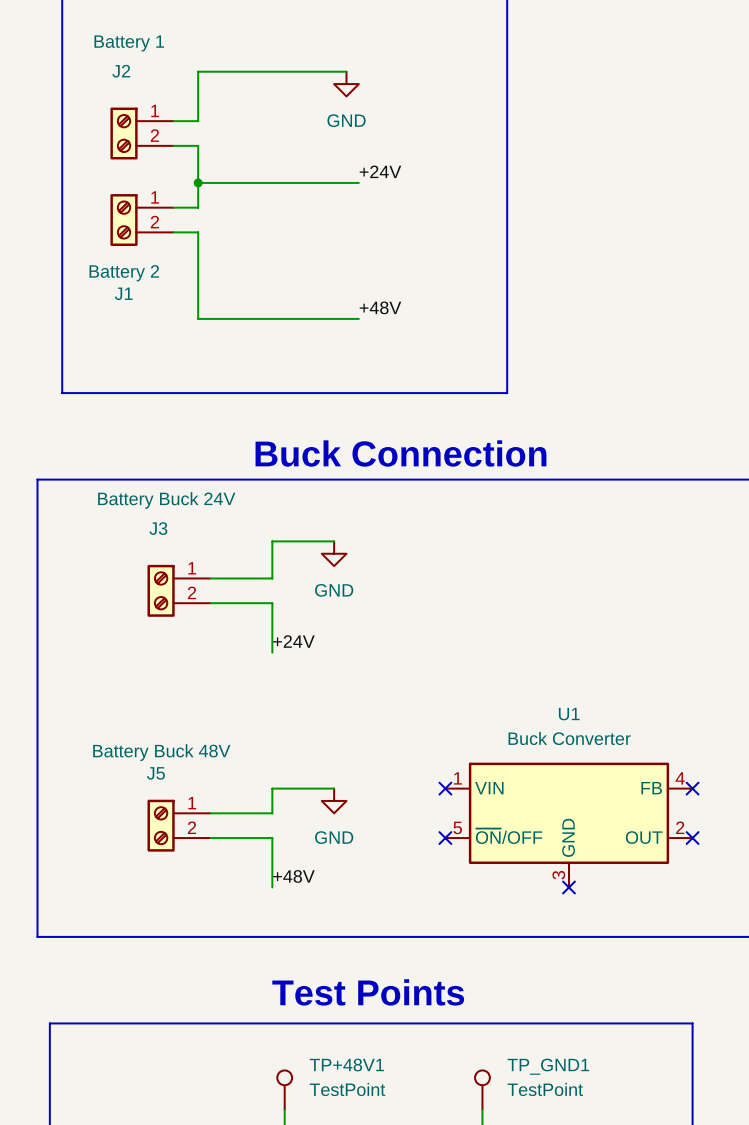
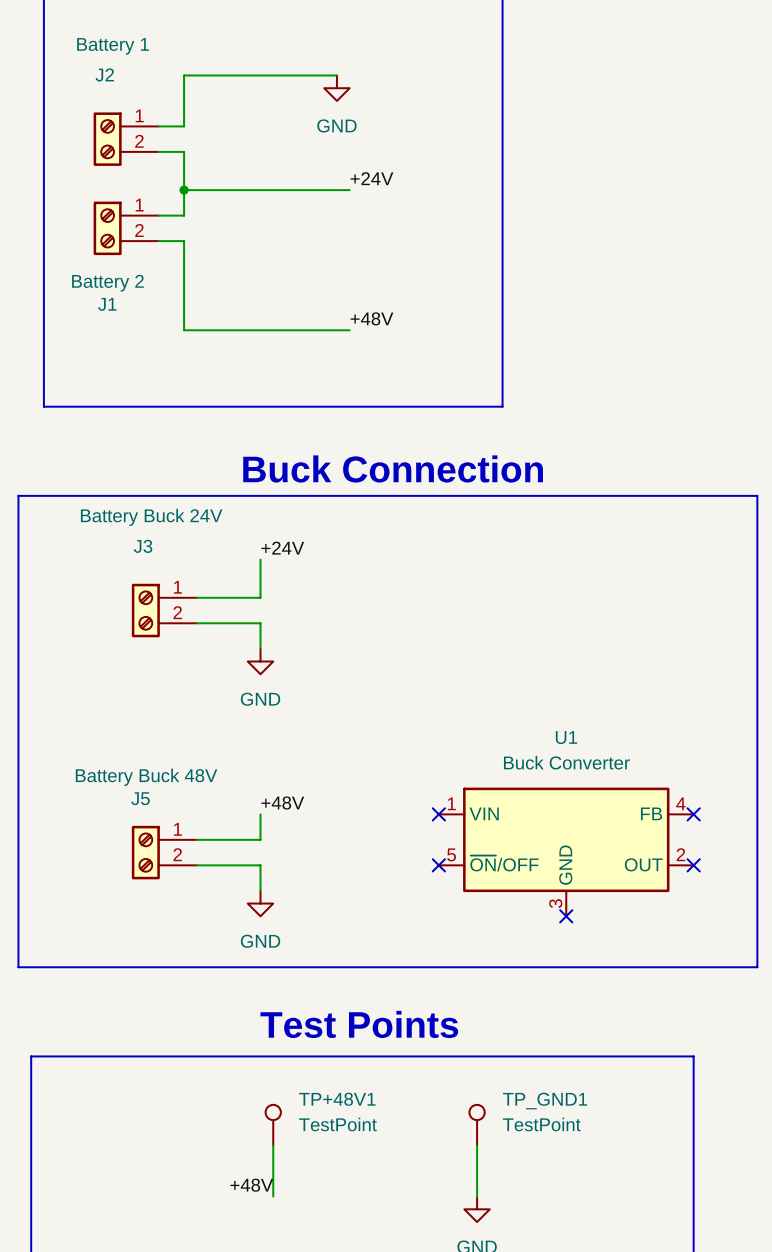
wire: (272, 541) (334, 541) -> none
power symbol: GND (334, 553) -> none
power symbol: none -> GND (260, 661)
label position: +24V (293, 641) -> +24V (282, 548)
wire: (272, 788) (334, 788) -> none
power symbol: GND (334, 800) -> none
power symbol: none -> GND (260, 903)
label position: +48V (293, 876) -> +48V (282, 803)

